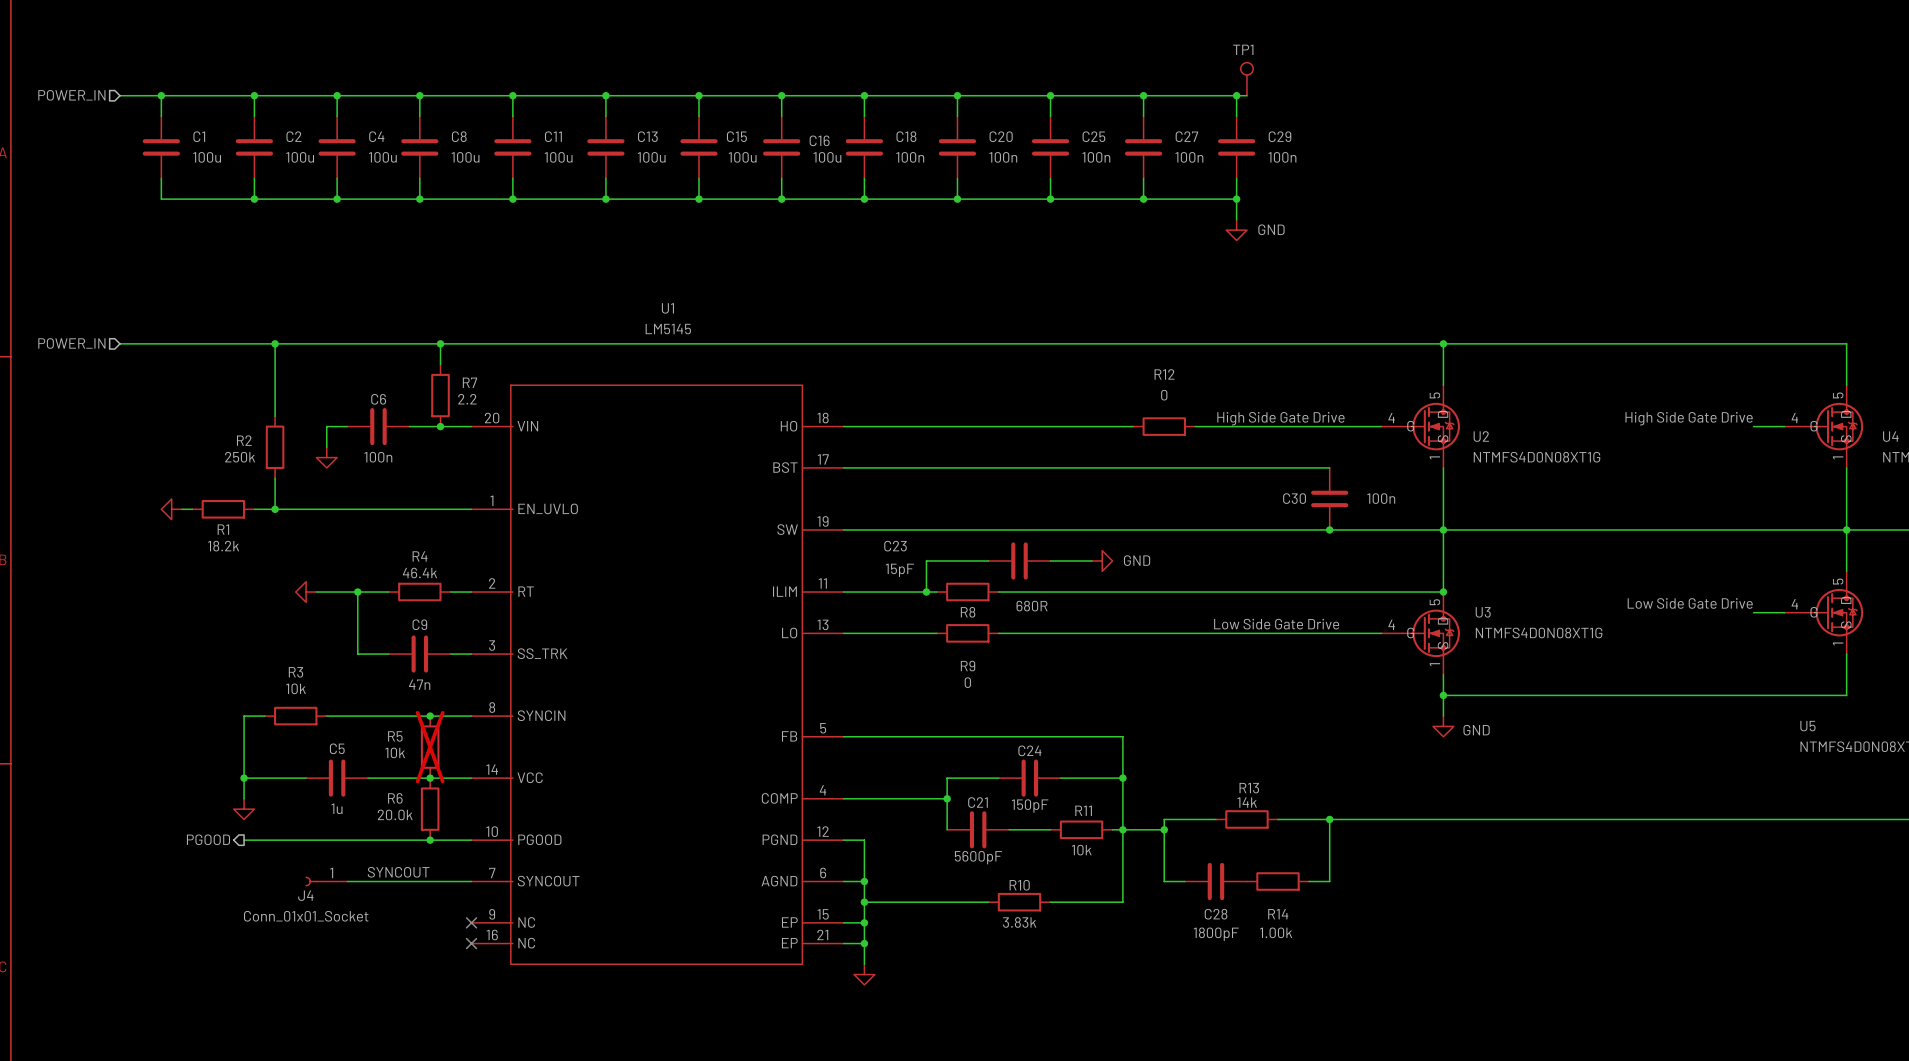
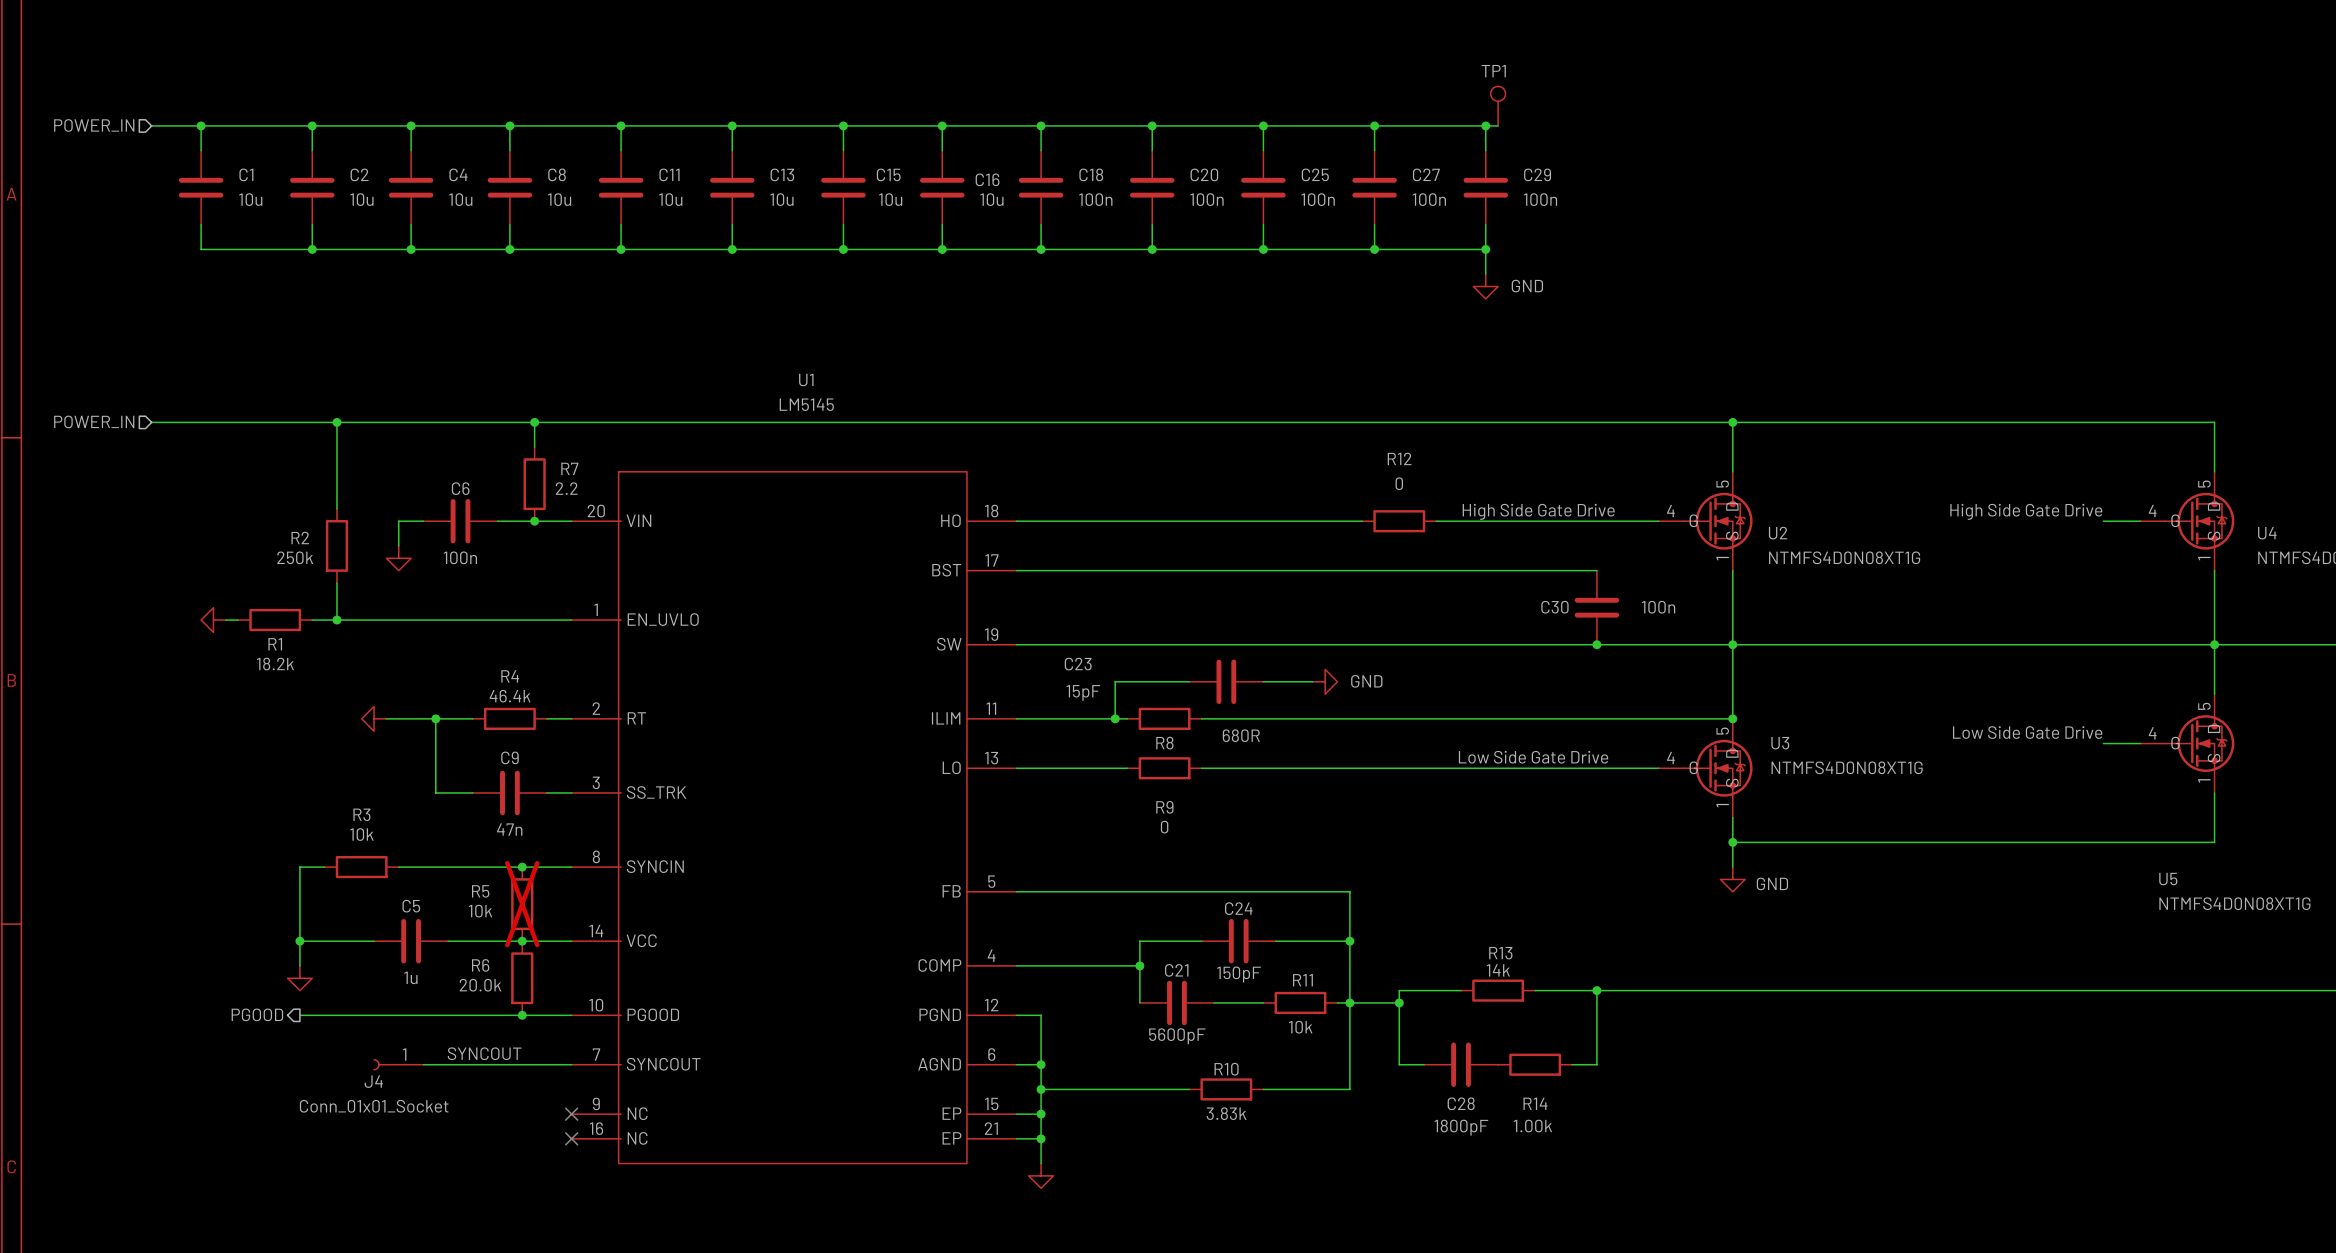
C1 value: 100u (207, 157) -> 10u (250, 199)
C2 value: 100u (300, 157) -> 10u (361, 199)
C4 value: 100u (382, 157) -> 10u (460, 199)
C8 value: 100u (465, 157) -> 10u (559, 199)
C11 value: 100u (558, 157) -> 10u (670, 199)
C13 value: 100u (651, 157) -> 10u (781, 199)
C15 value: 100u (742, 157) -> 10u (890, 199)
C16 value: 100u (827, 157) -> 10u (991, 199)

